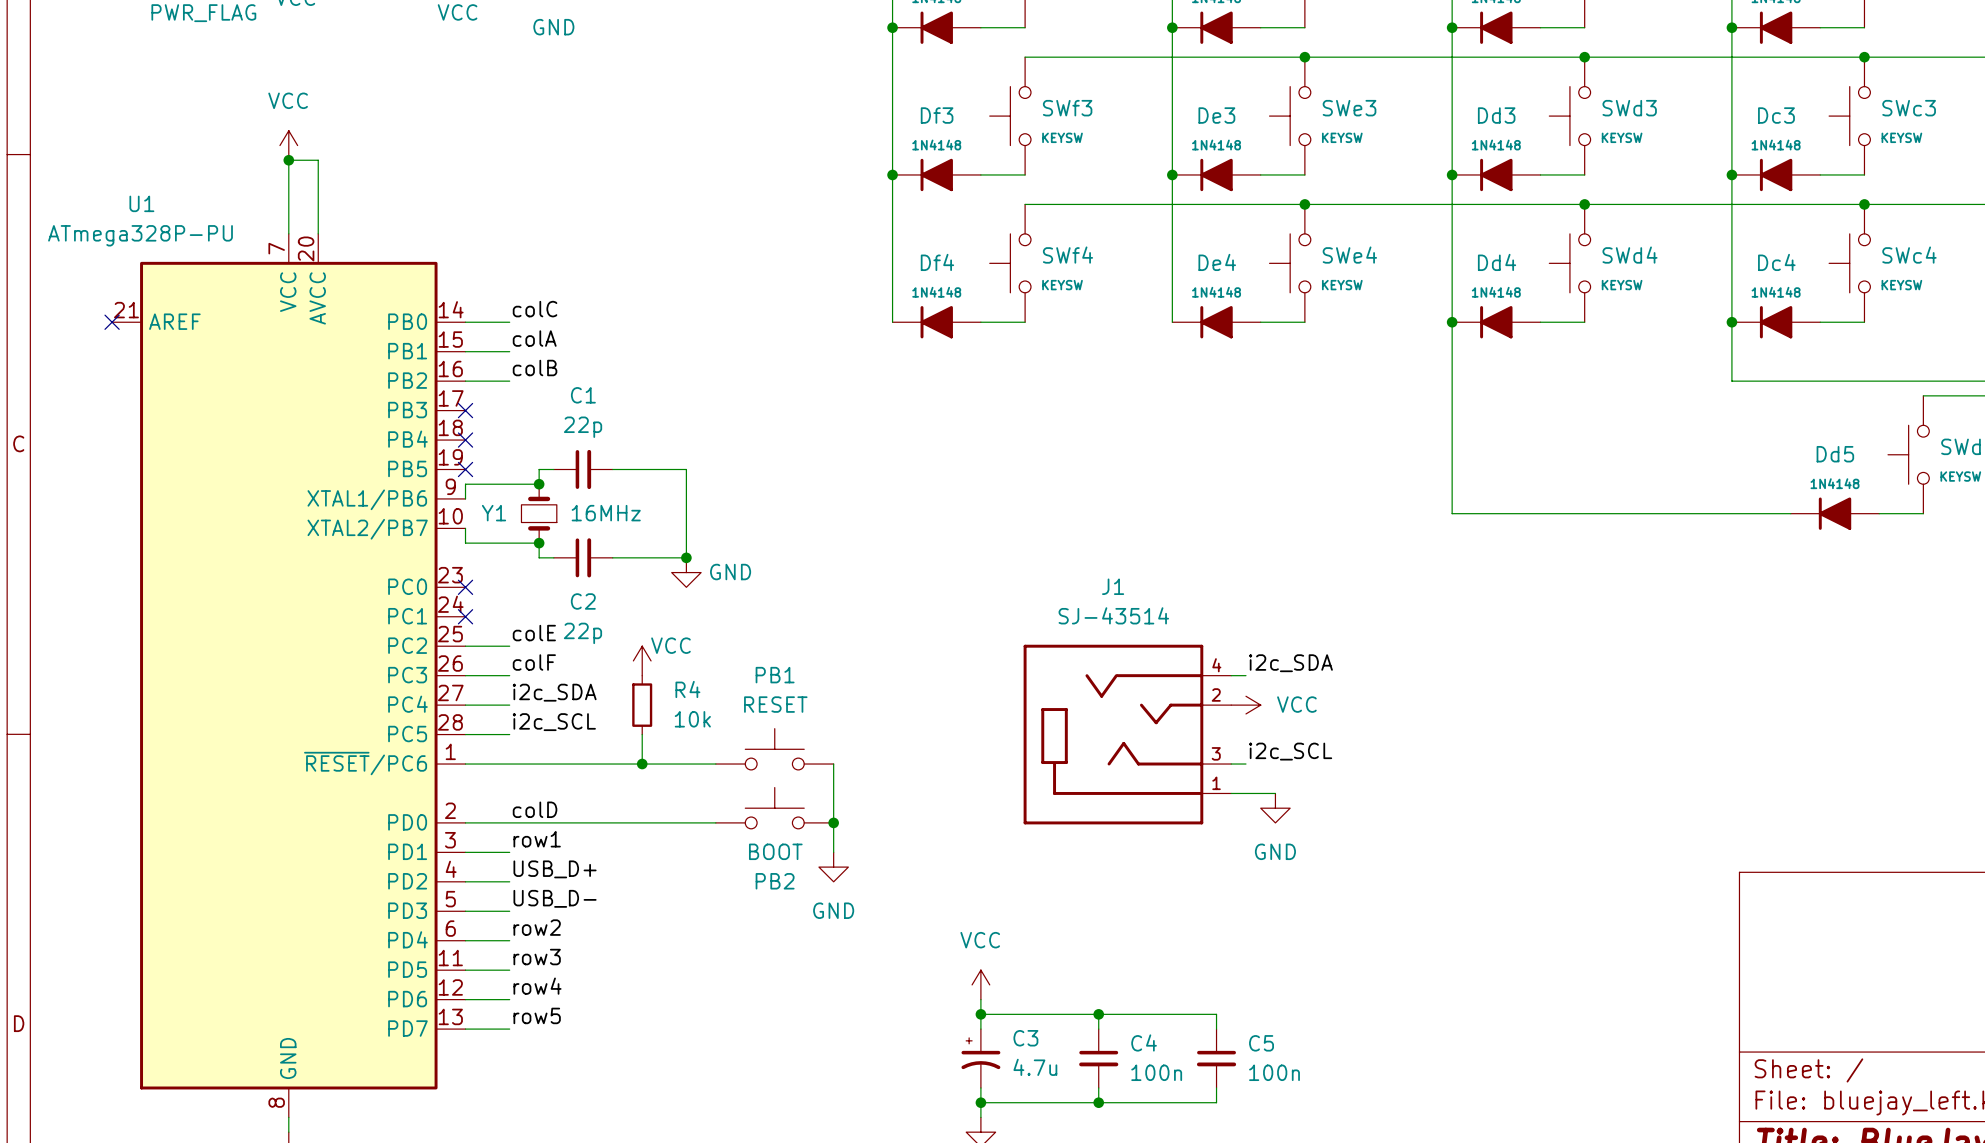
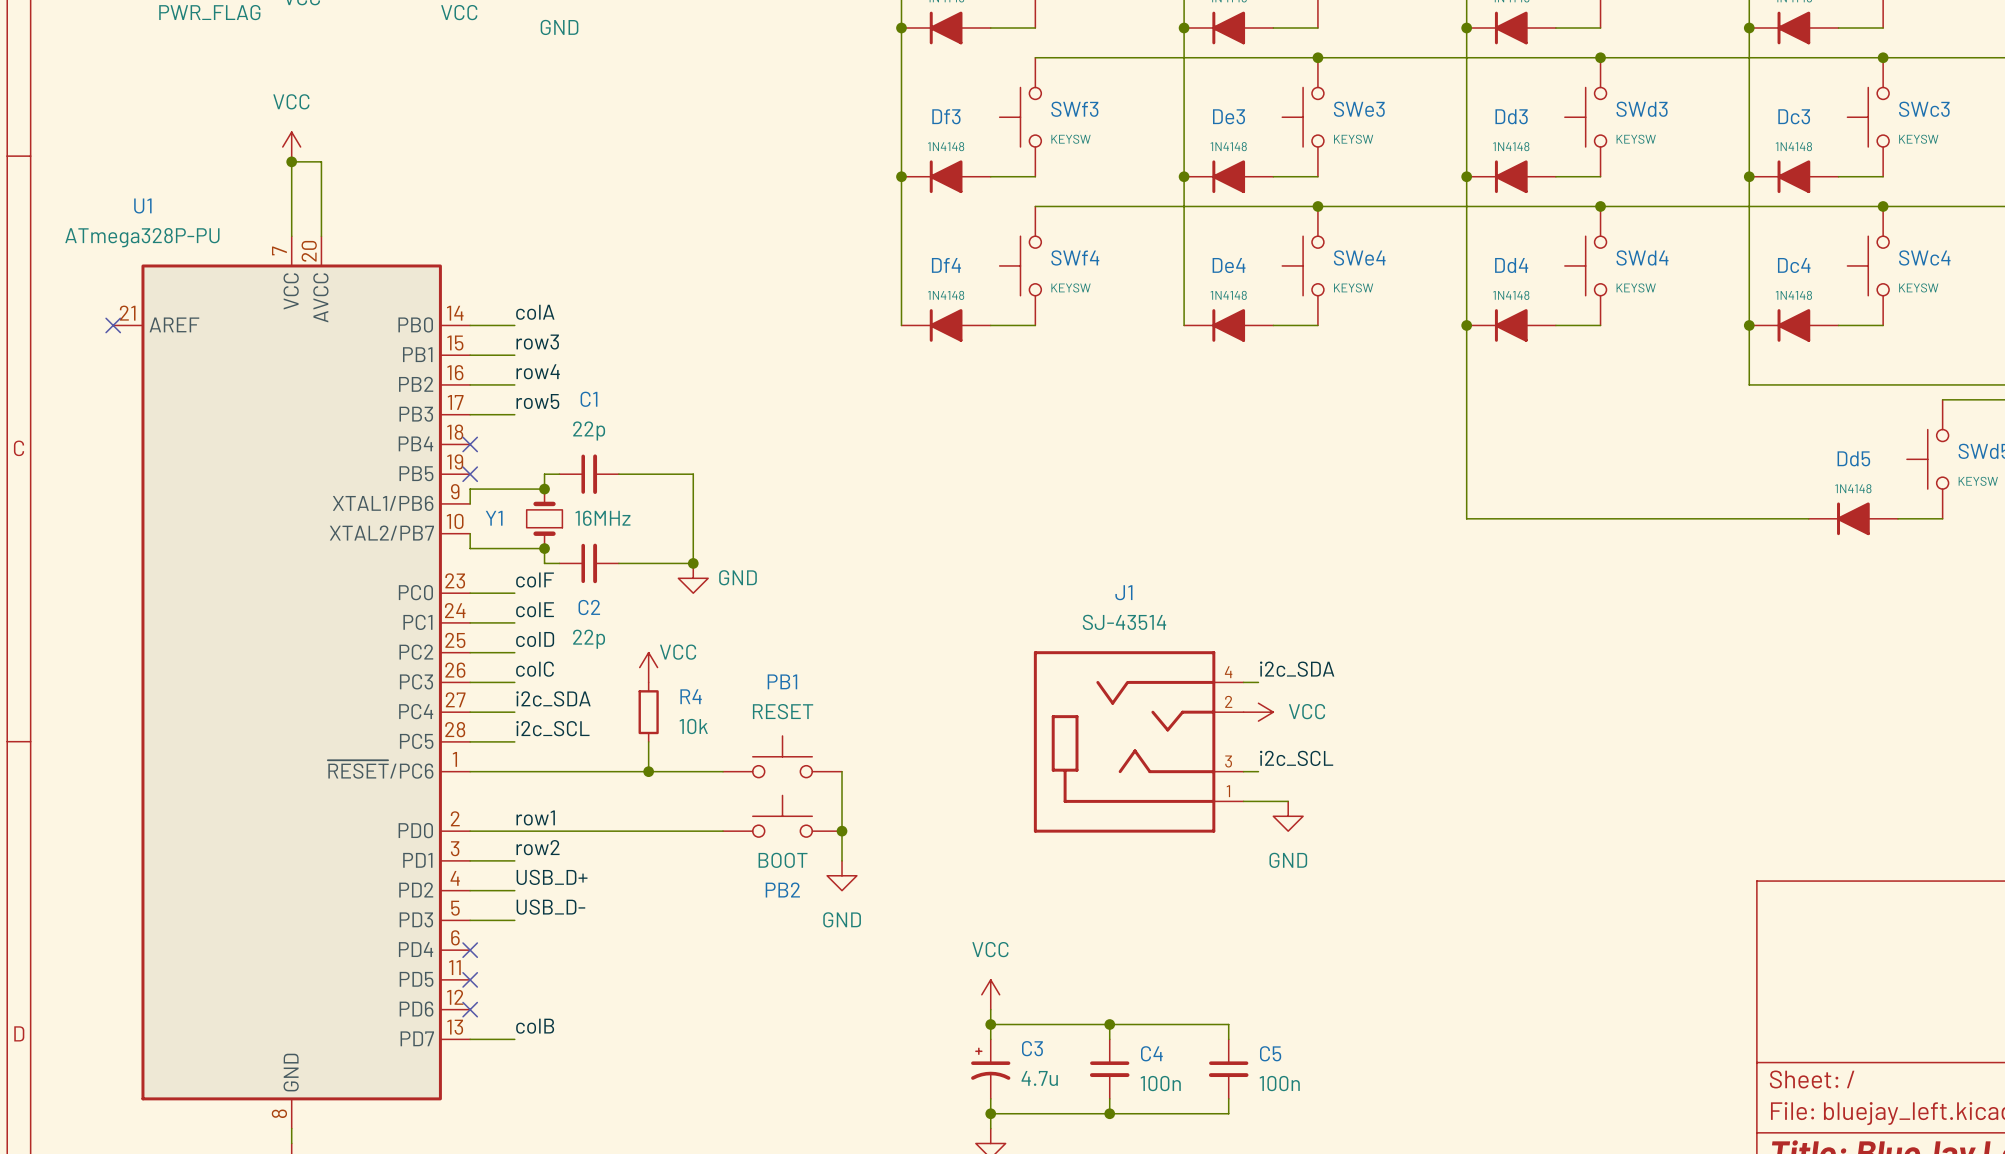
label: colC (535, 309) -> colA (535, 312)
label: colA (534, 338) -> row3 (537, 342)
label: colB (535, 368) -> row4 (538, 371)
label: none -> row5 (537, 401)
wire: none -> (470, 414) (514, 414)
no-connect mark: (465, 410) -> none
label: none -> colF (535, 579)
wire: none -> (470, 593) (514, 593)
no-connect mark: (465, 587) -> none
label: none -> colE (535, 609)
wire: none -> (470, 622) (514, 622)
no-connect mark: (465, 616) -> none
label: colE (534, 633) -> colD (535, 639)
label: colF (534, 662) -> colC (534, 669)
label: colD (535, 809) -> row1 (535, 817)
label: row1 (537, 839) -> row2 (538, 847)
label: row2 (537, 927) -> none
wire: (465, 940) (509, 940) -> none
no-connect mark: none -> (470, 950)
label: row3 (537, 957) -> none
wire: (465, 970) (509, 970) -> none
no-connect mark: none -> (470, 979)
label: row4 (537, 986) -> none
wire: (465, 999) (509, 999) -> none
no-connect mark: none -> (470, 1009)
label: row5 (537, 1015) -> colB (535, 1026)

